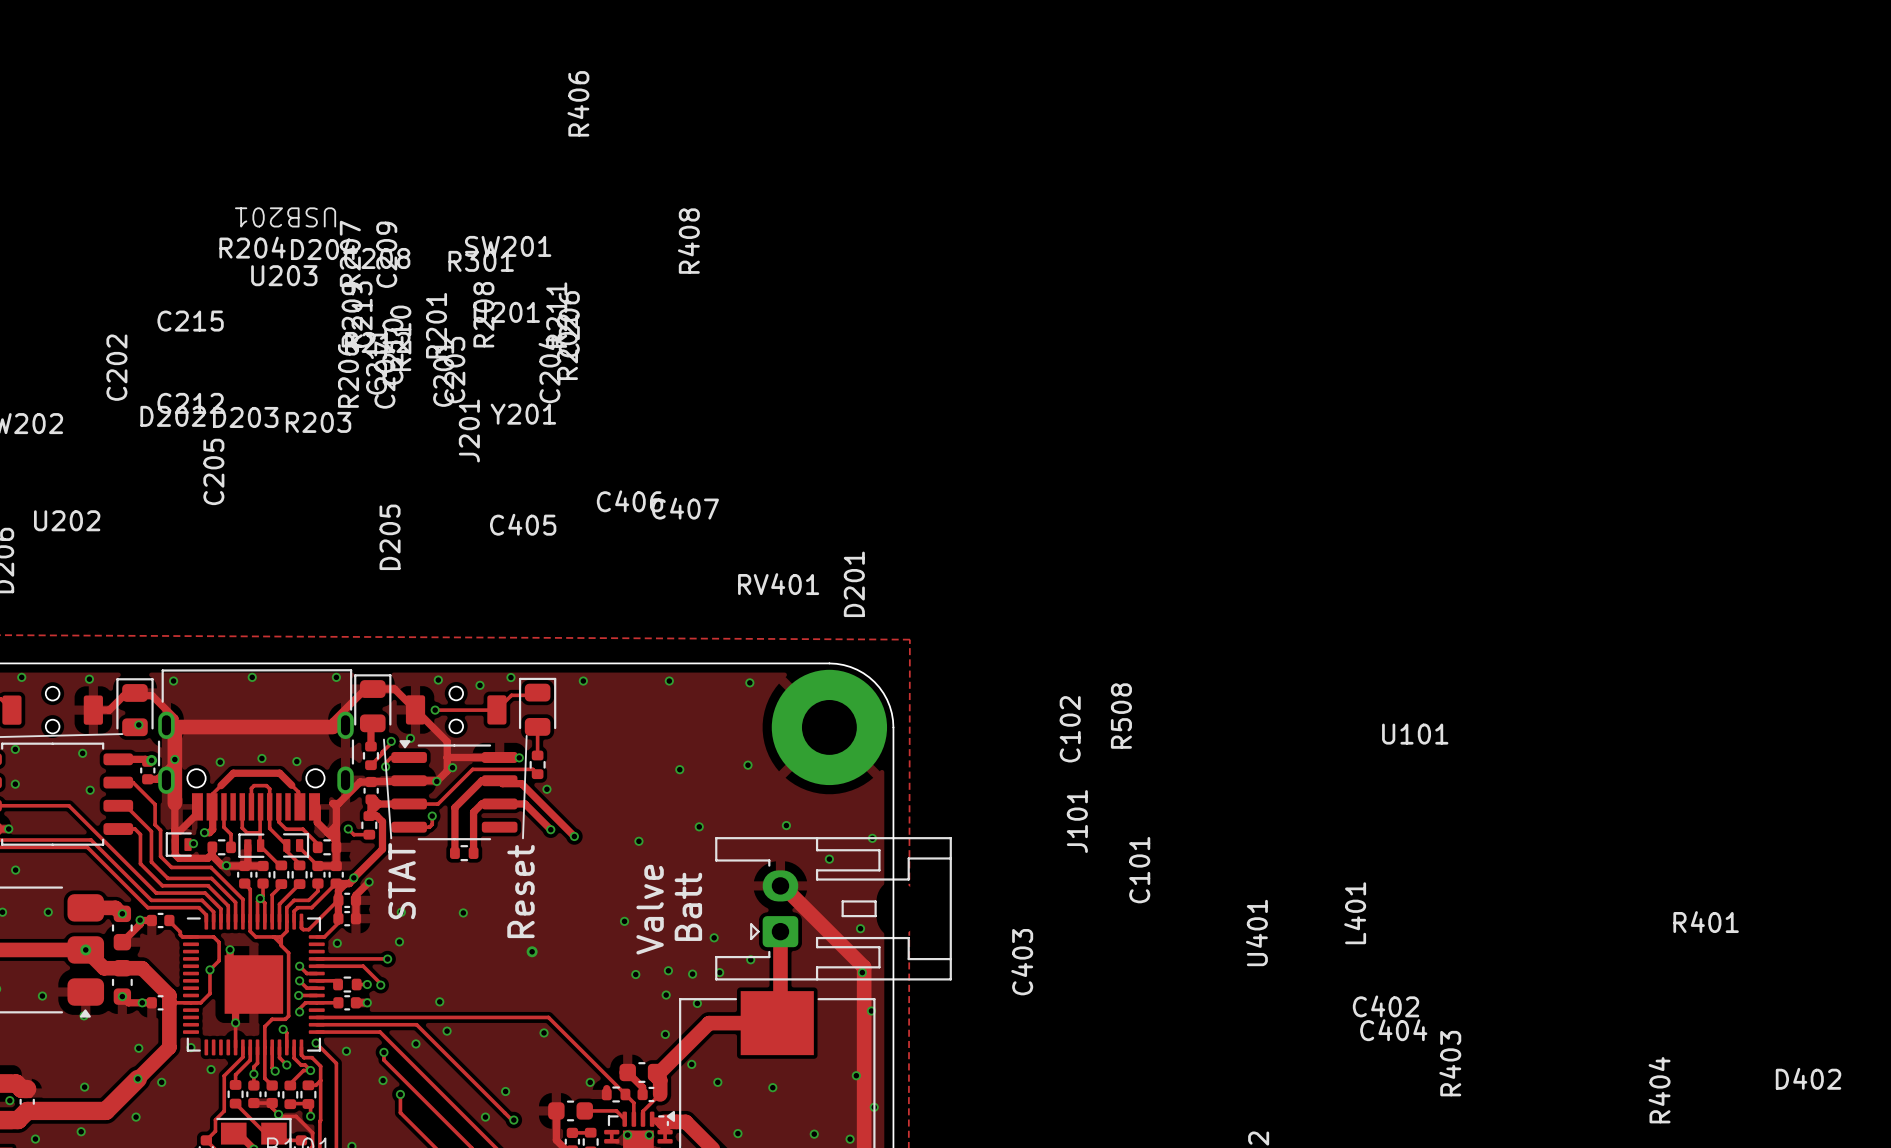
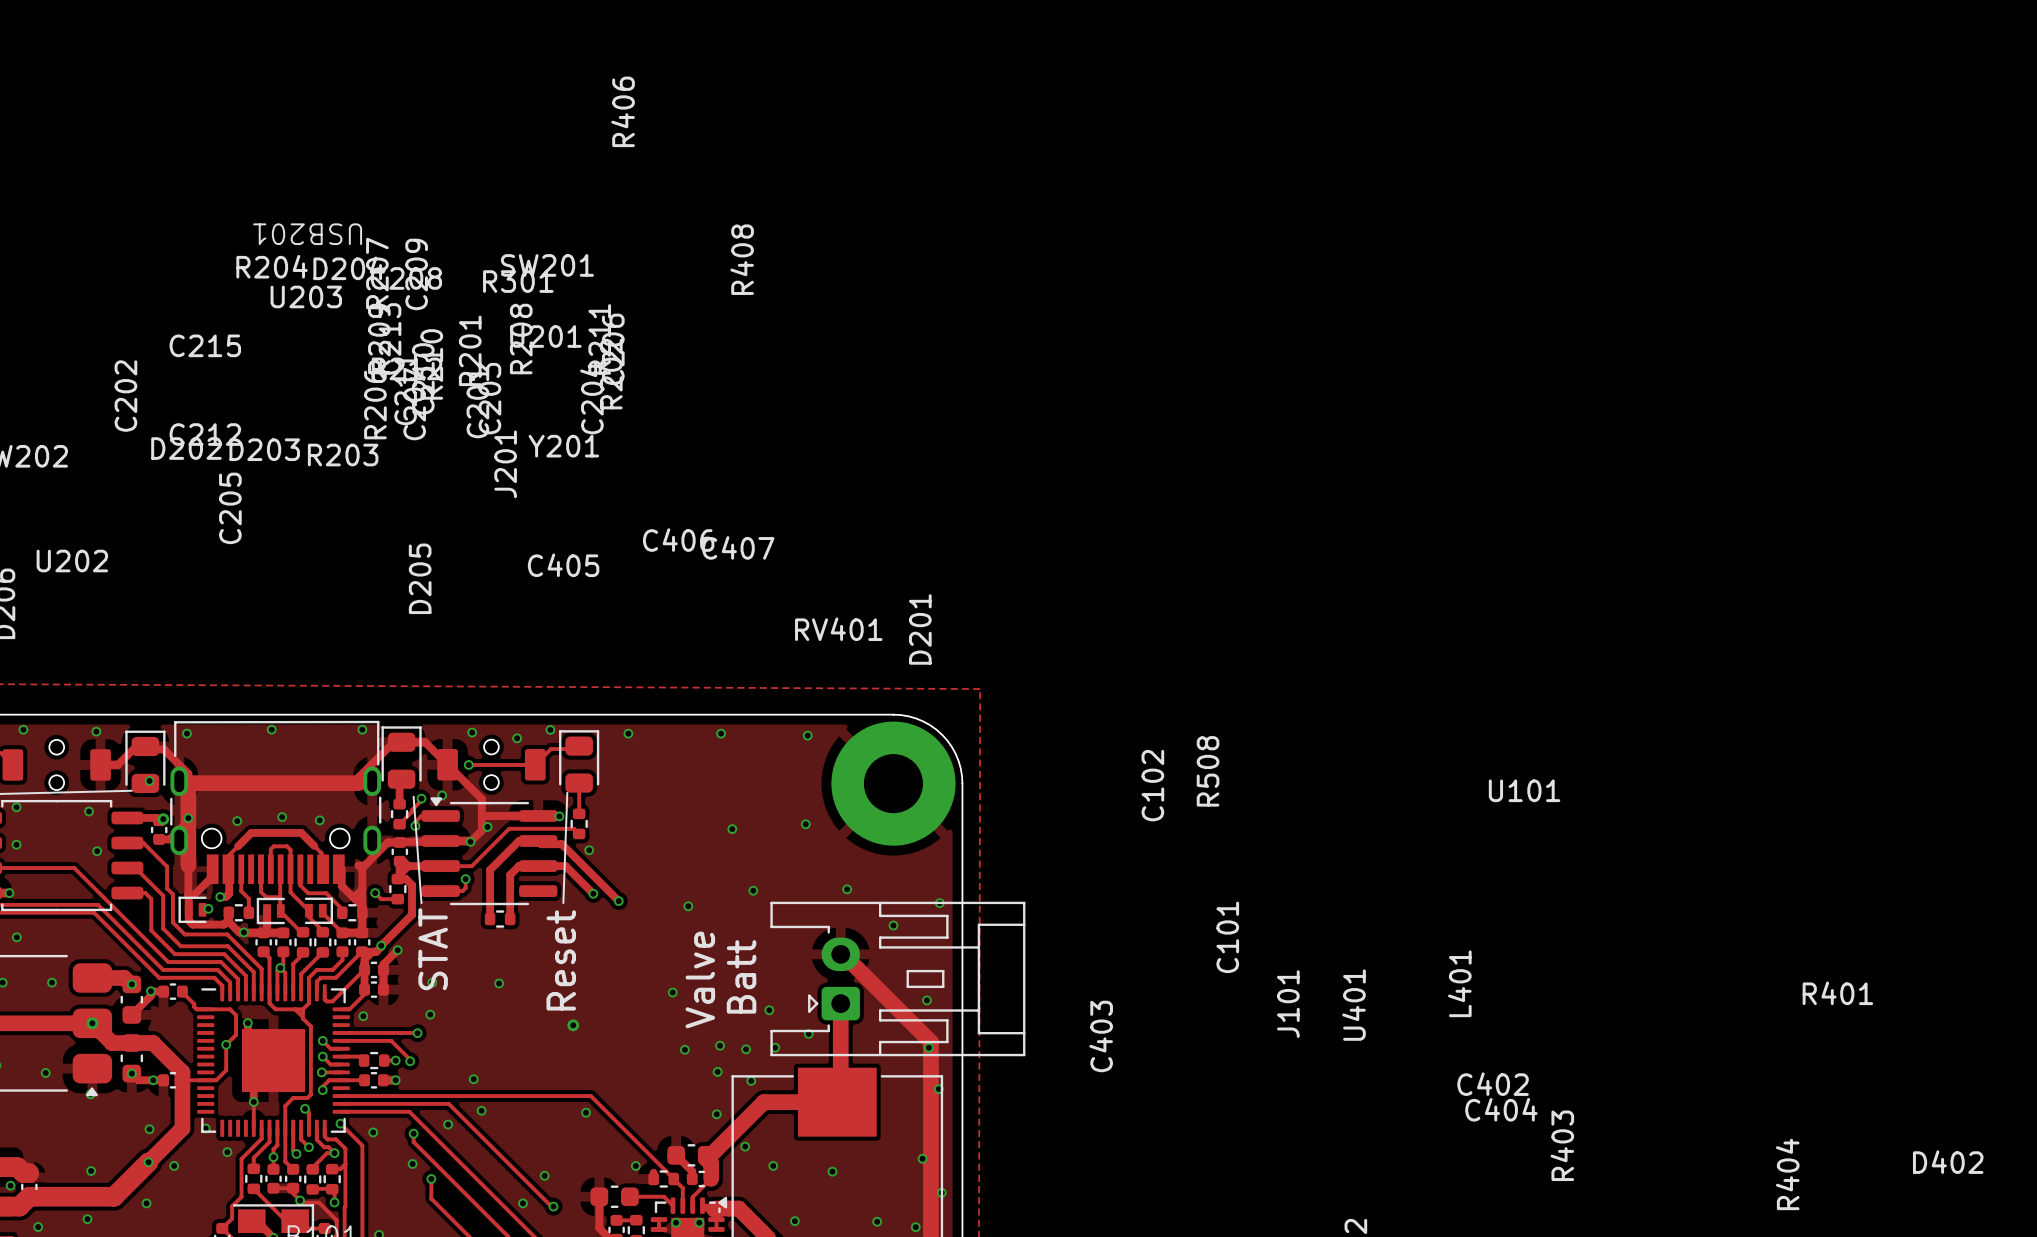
J101 name position: J101 (1077, 821) -> J101 (1288, 1004)
J101 footprint: [715, 837, 952, 981] -> [770, 901, 1026, 1057]

